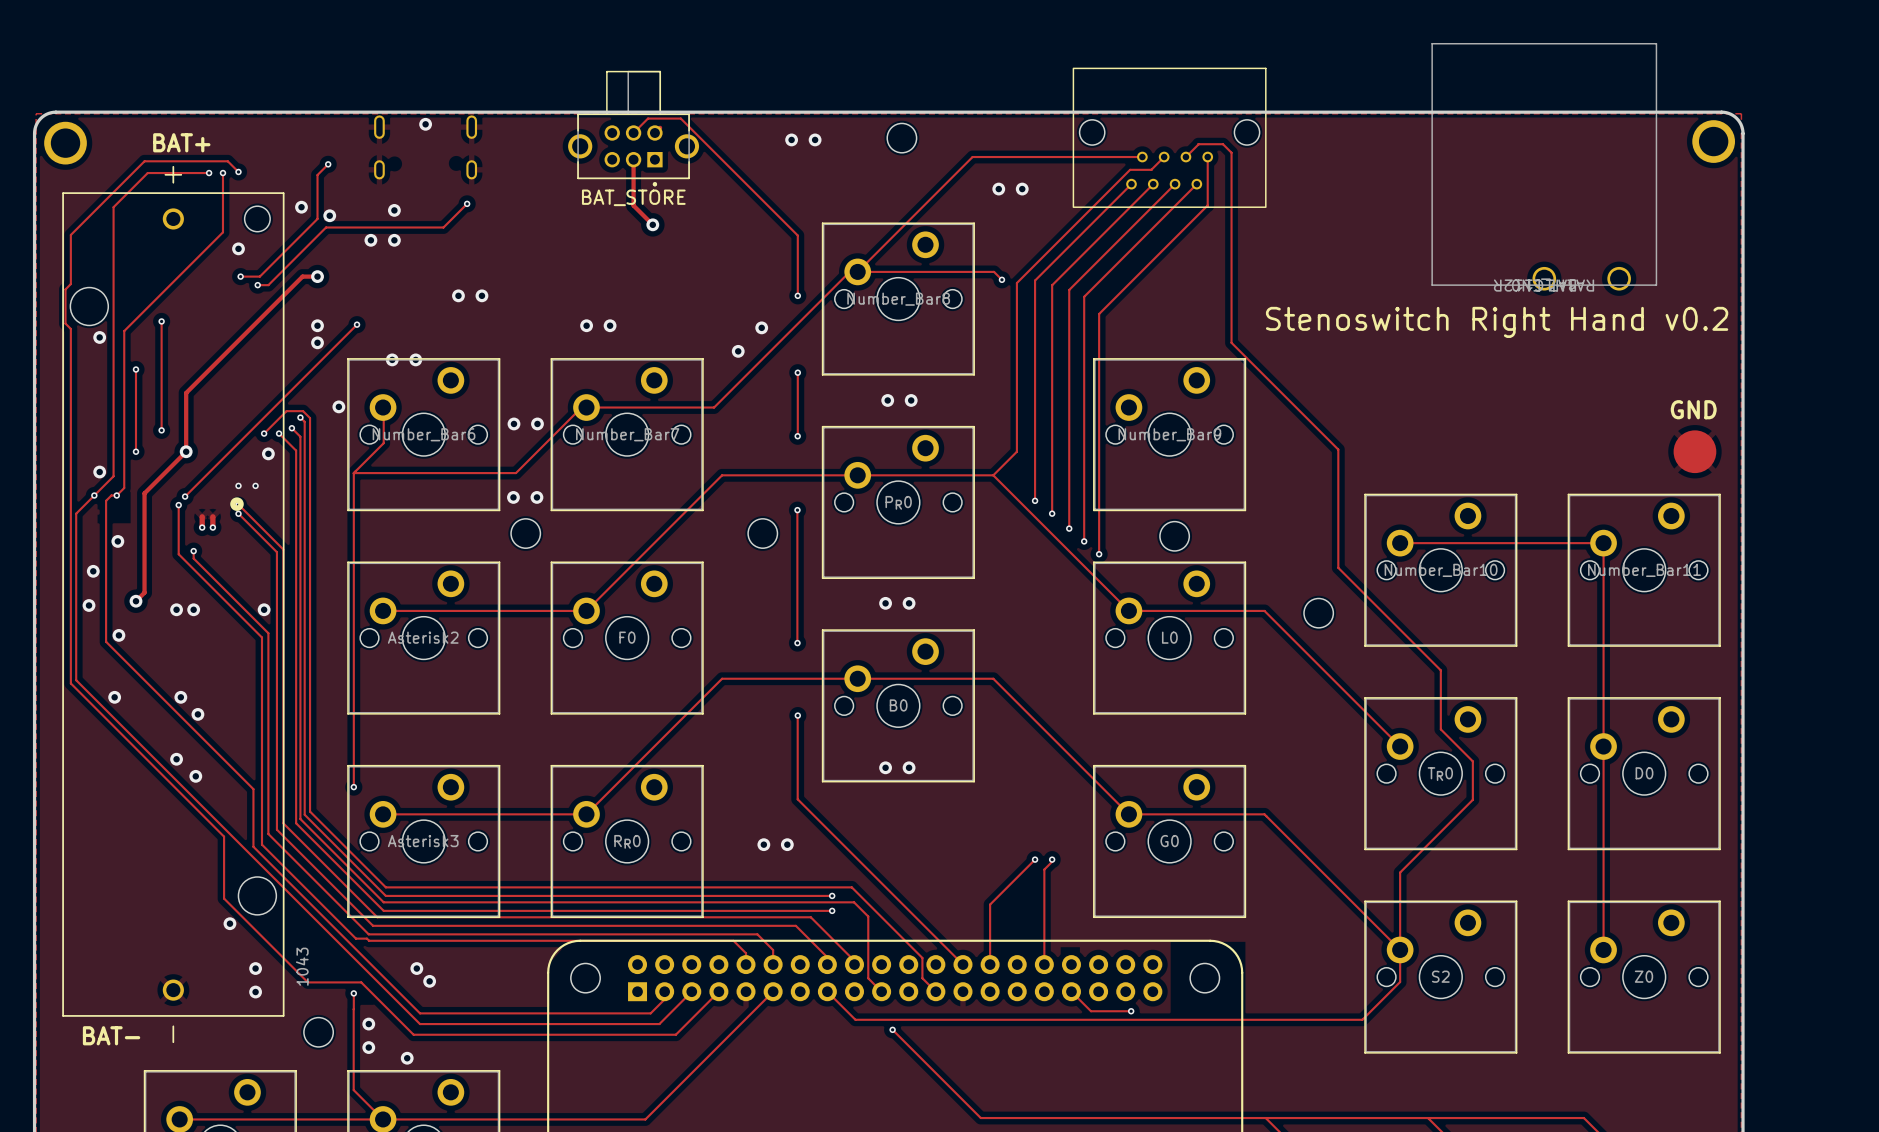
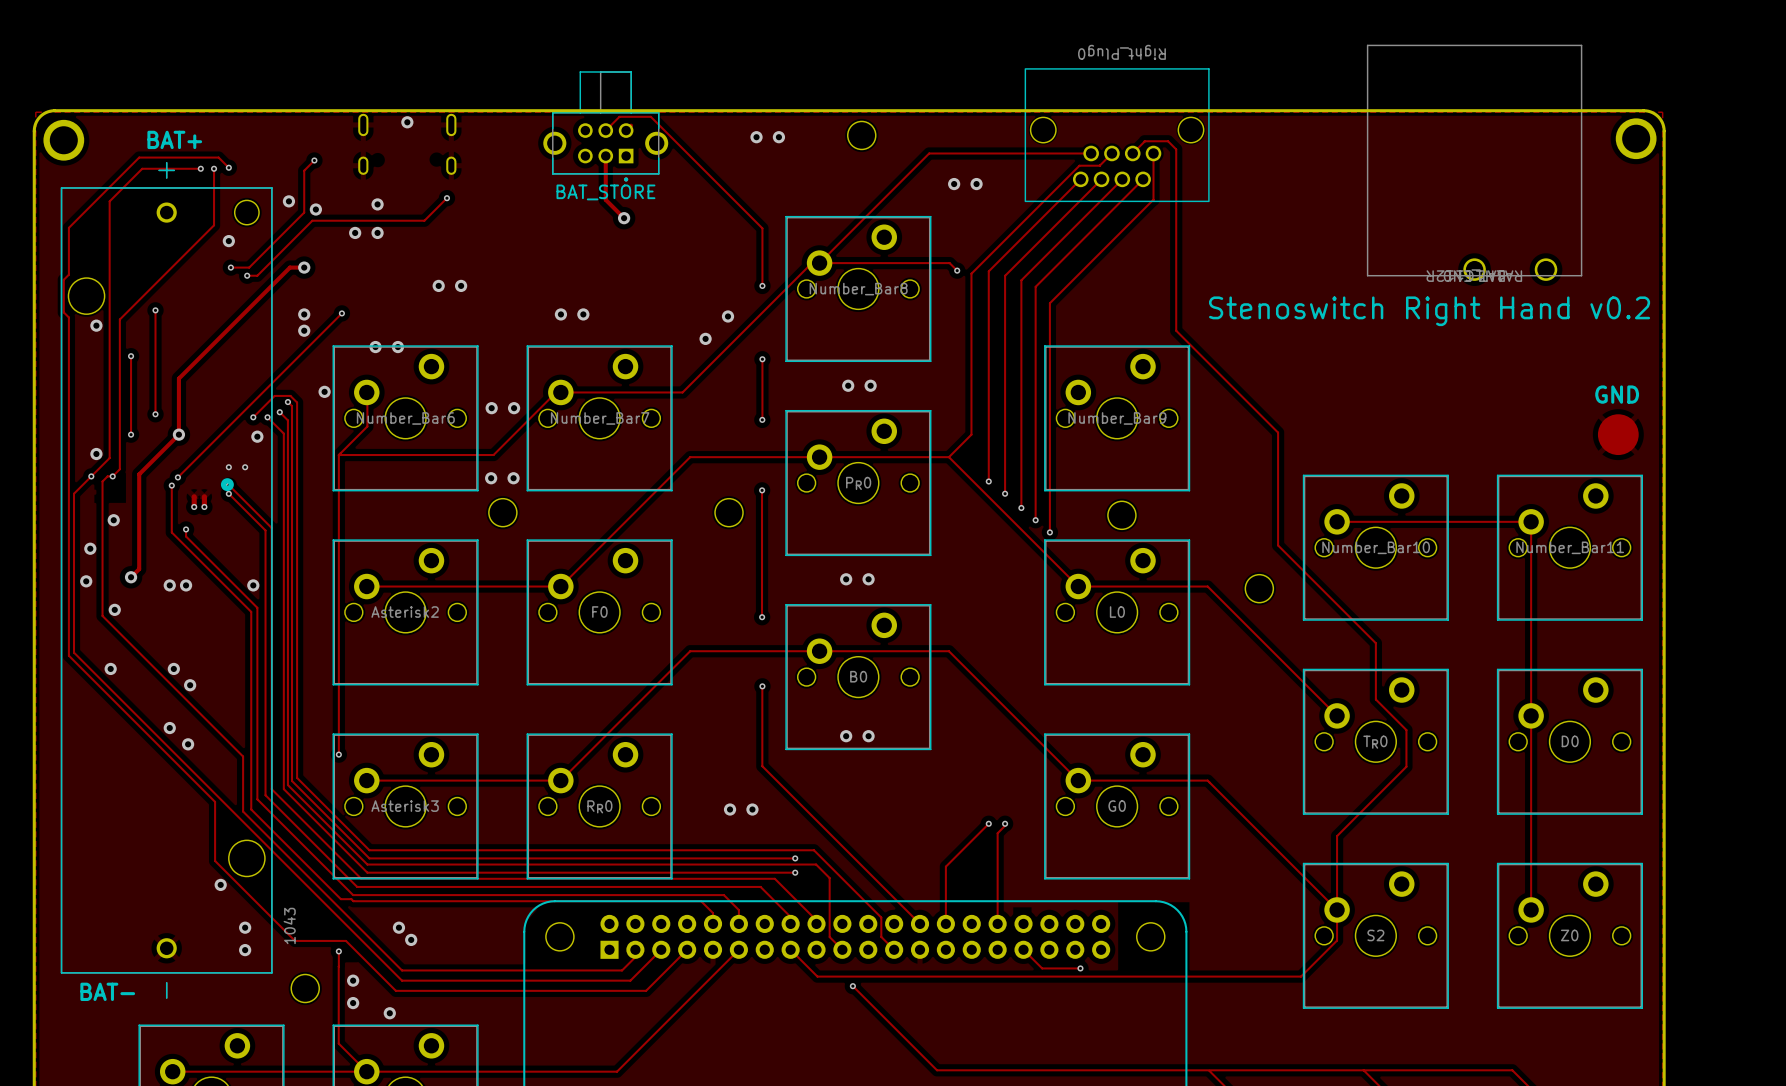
part: (1169, 137) -> none
Right_Plug0: none -> (1117, 135)

